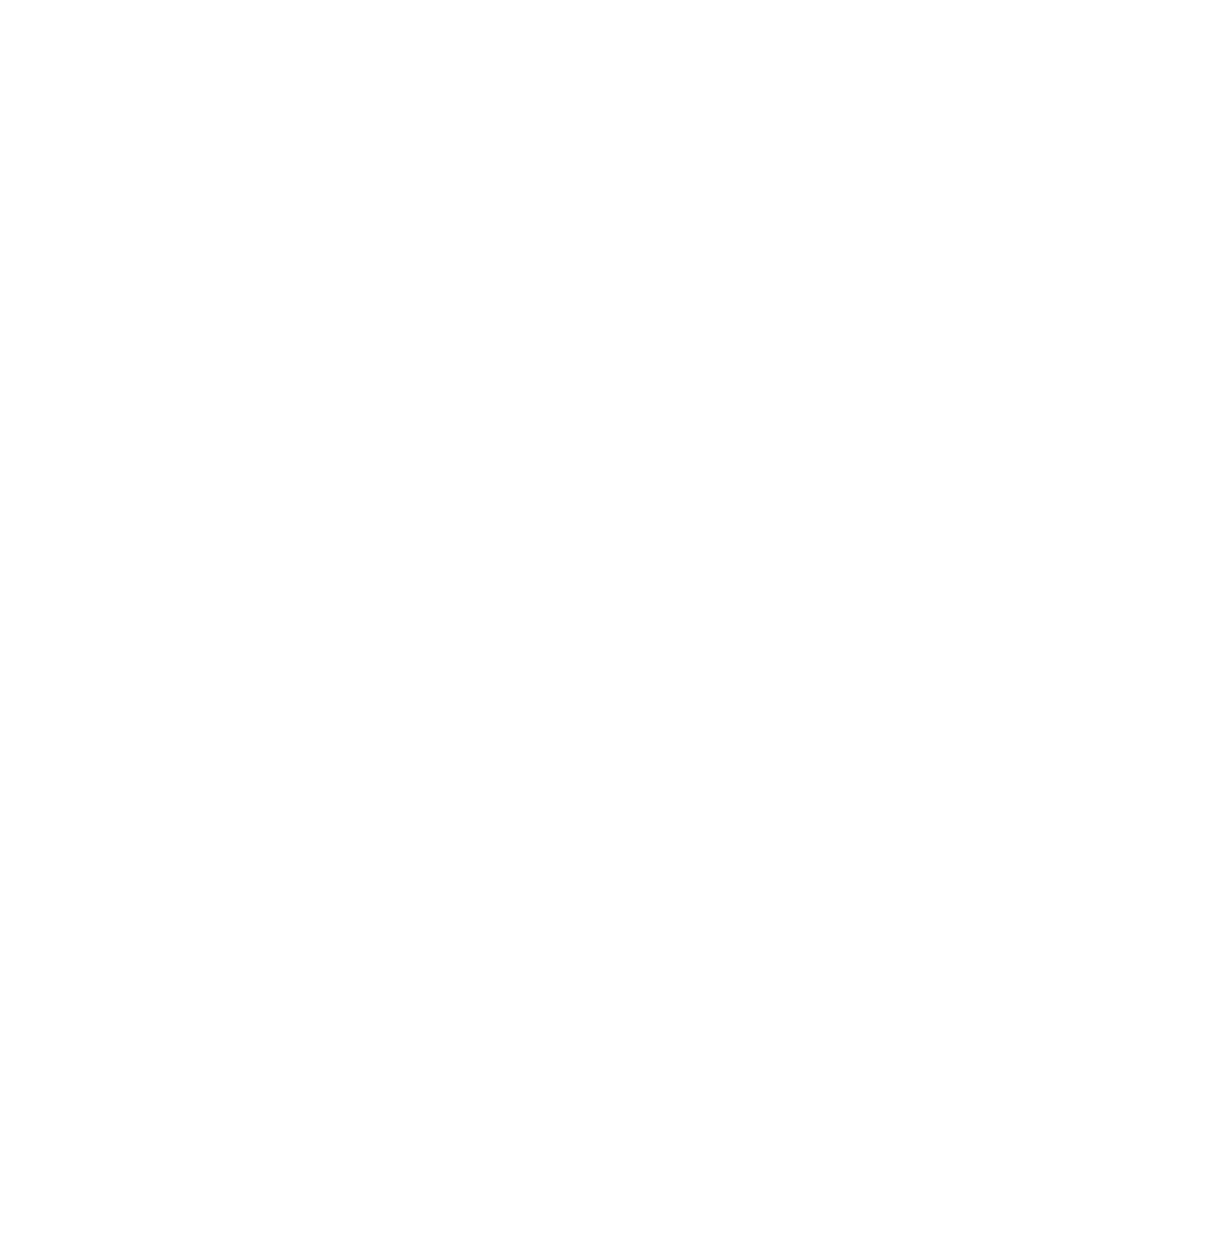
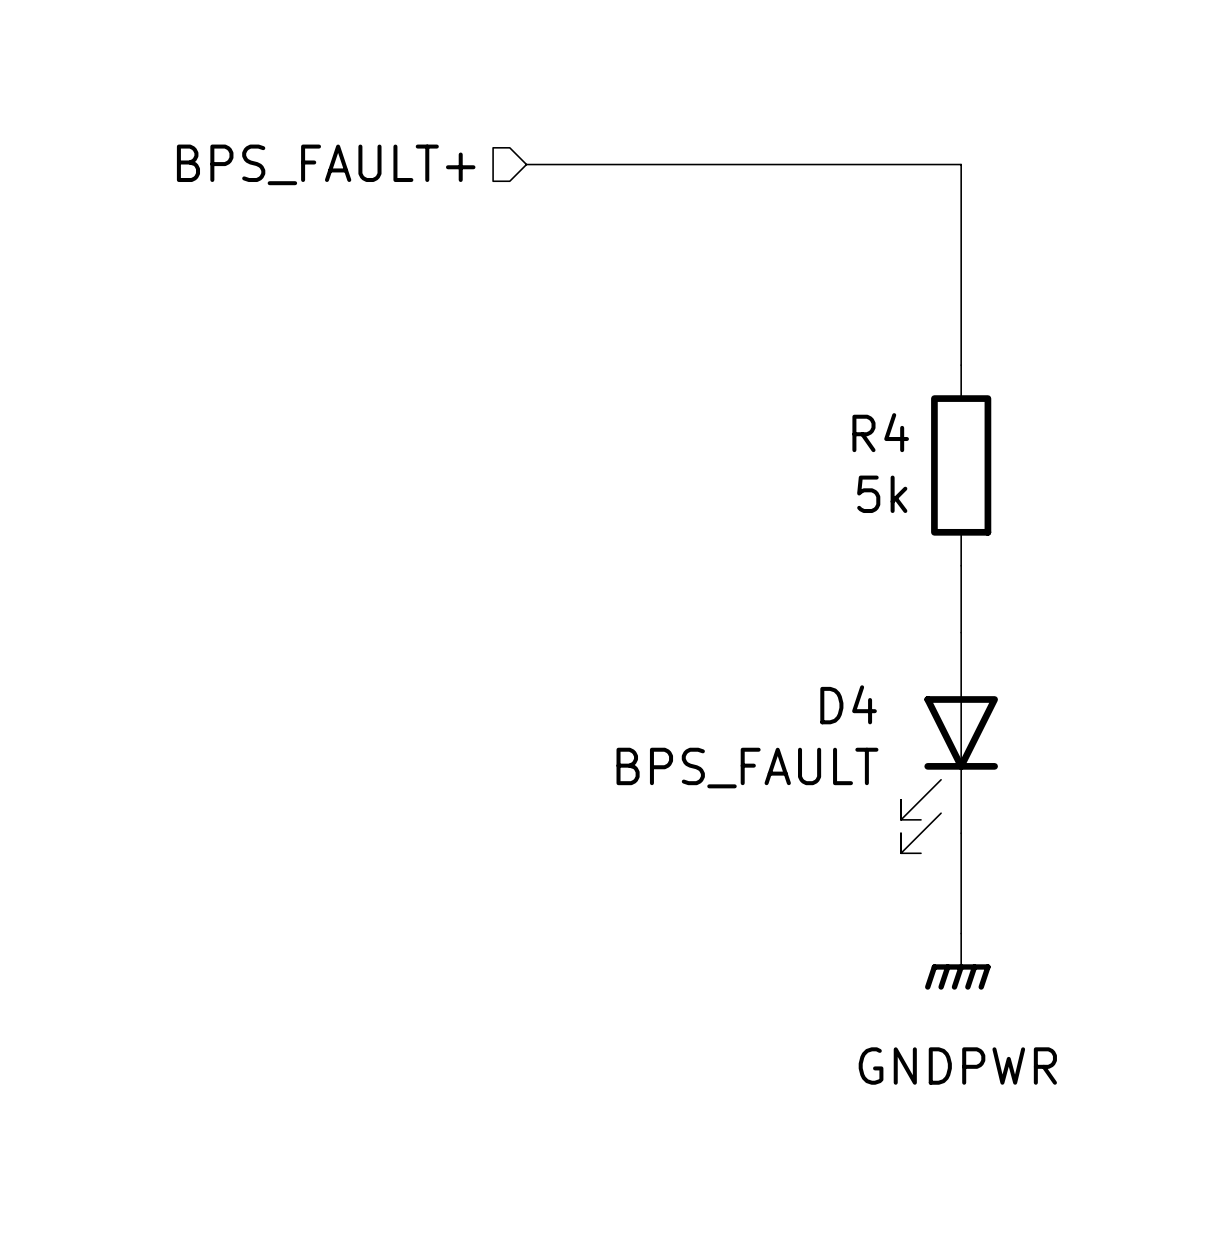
wire: none -> (526, 164) (961, 164) (961, 365)
hierarchical label: none -> BPS_FAULT+ (326, 164)
R4: none -> 5k (961, 465)
wire: none -> (961, 565) (961, 632)
D4: none -> BPS_FAULT (949, 742)
wire: none -> (961, 833) (961, 933)
power symbol: none -> GNDPWR (957, 961)

